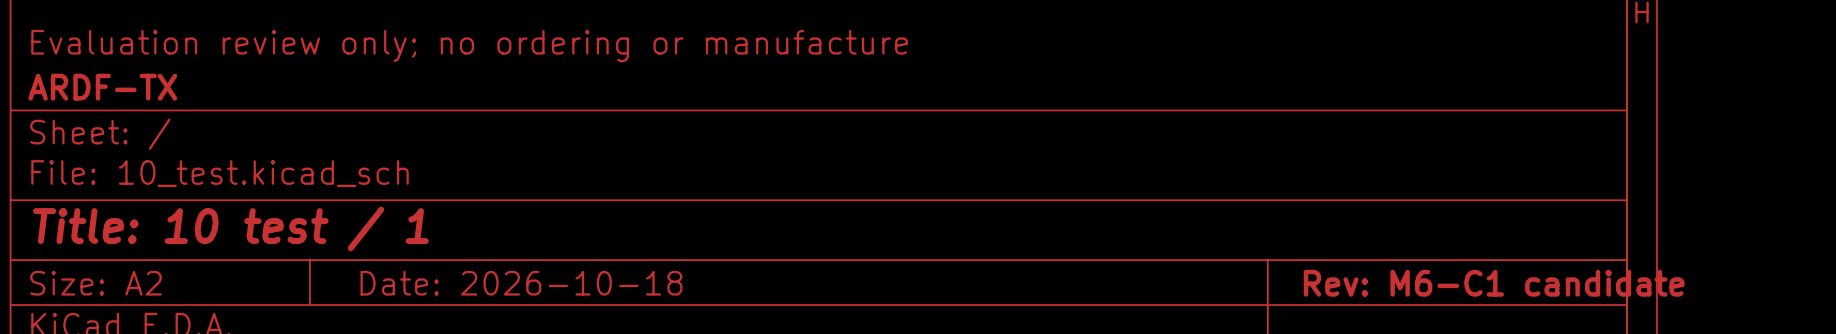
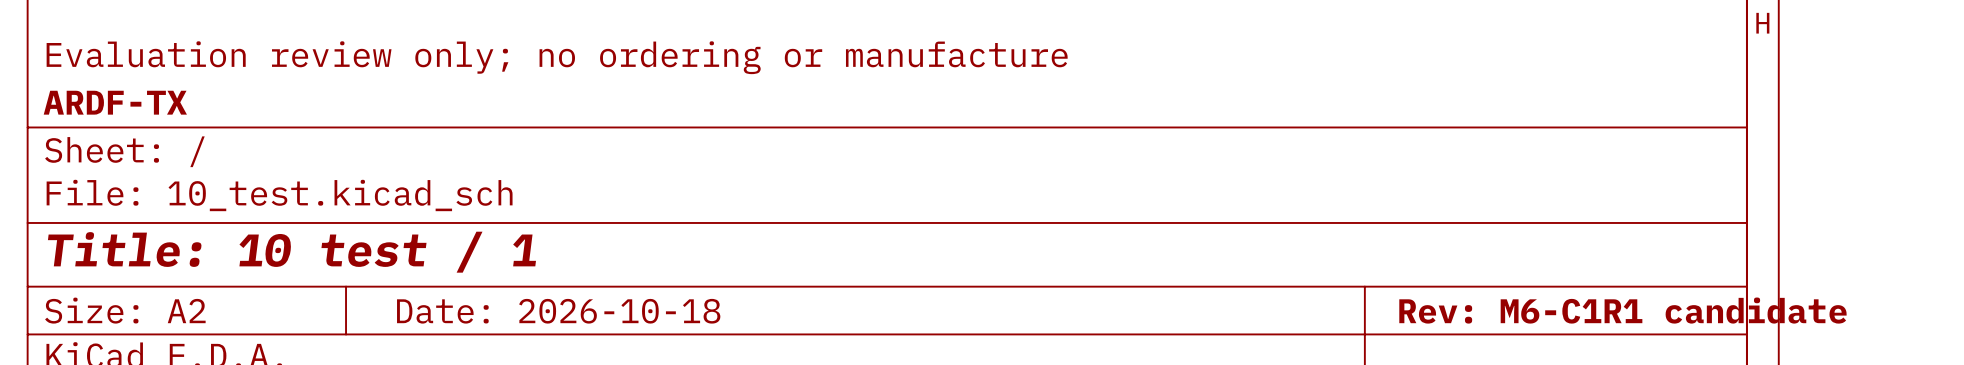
title block: Rev: M6-C1 candidate (1494, 283) -> Rev: M6-C1R1 candidate (1622, 310)

